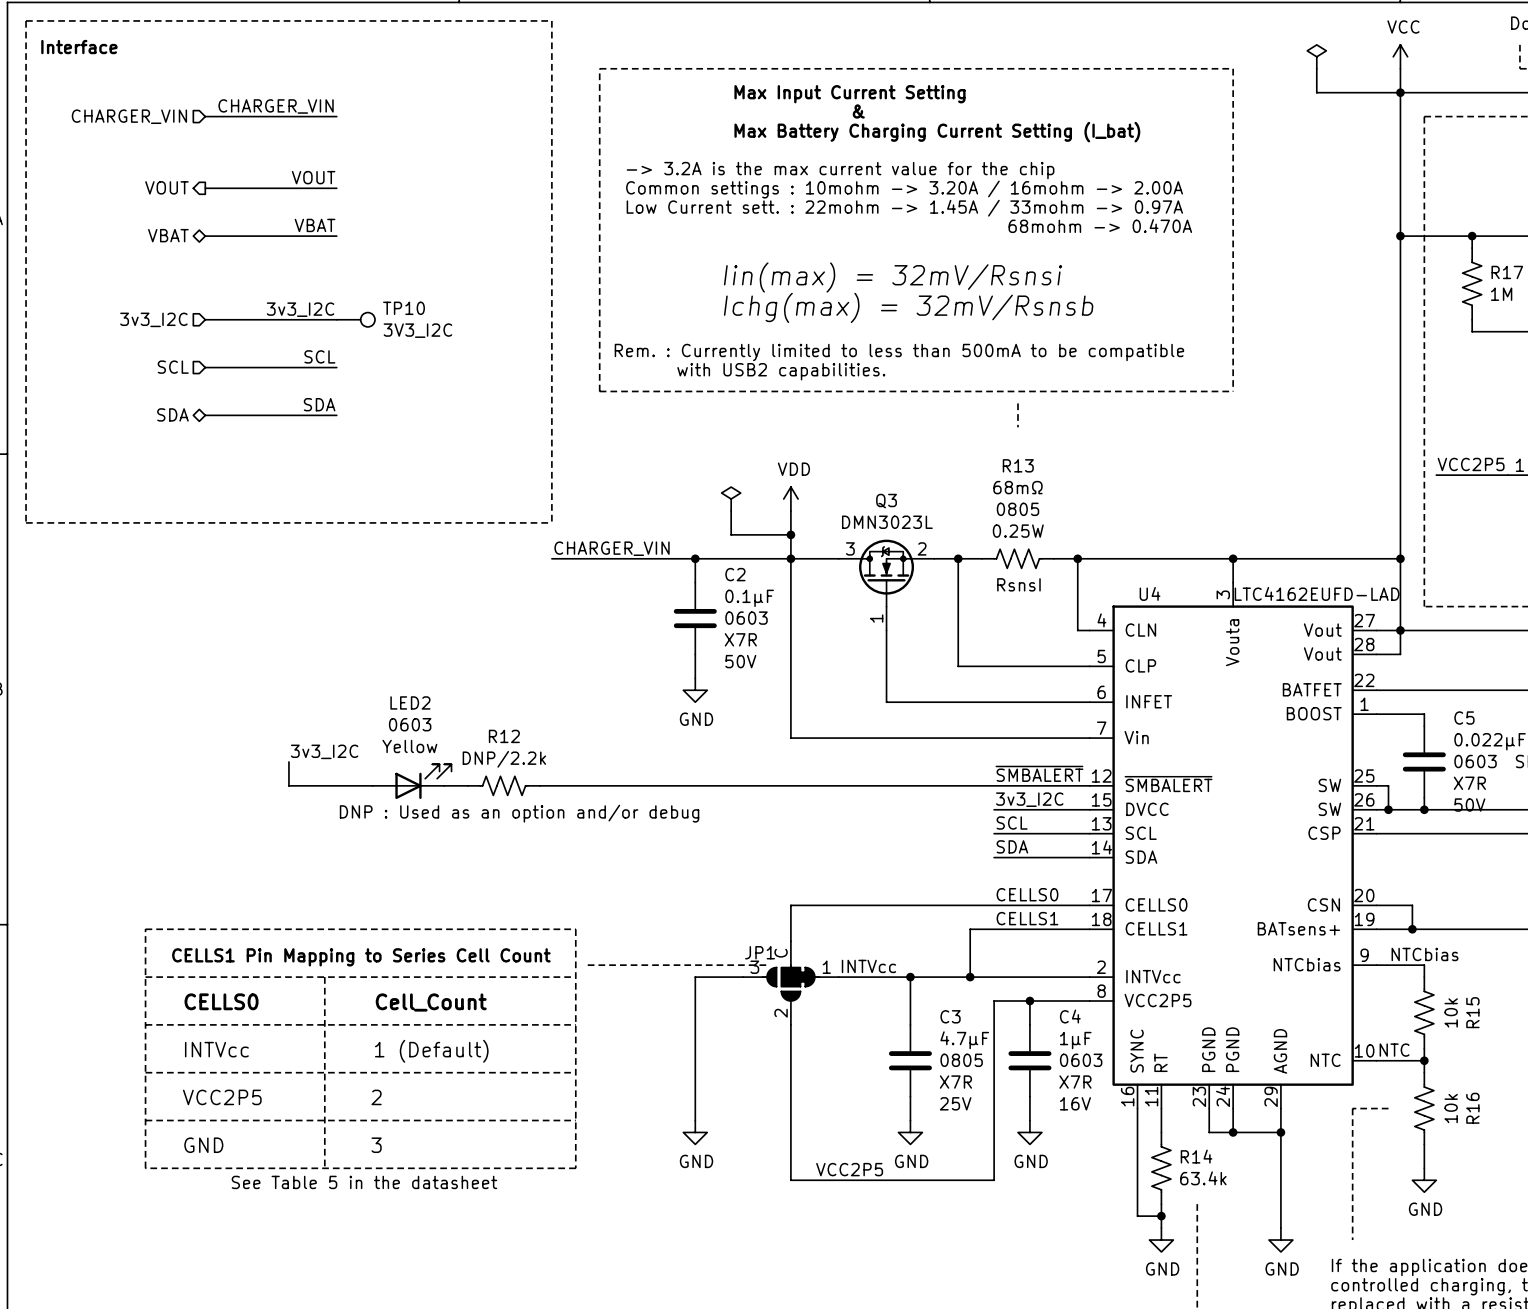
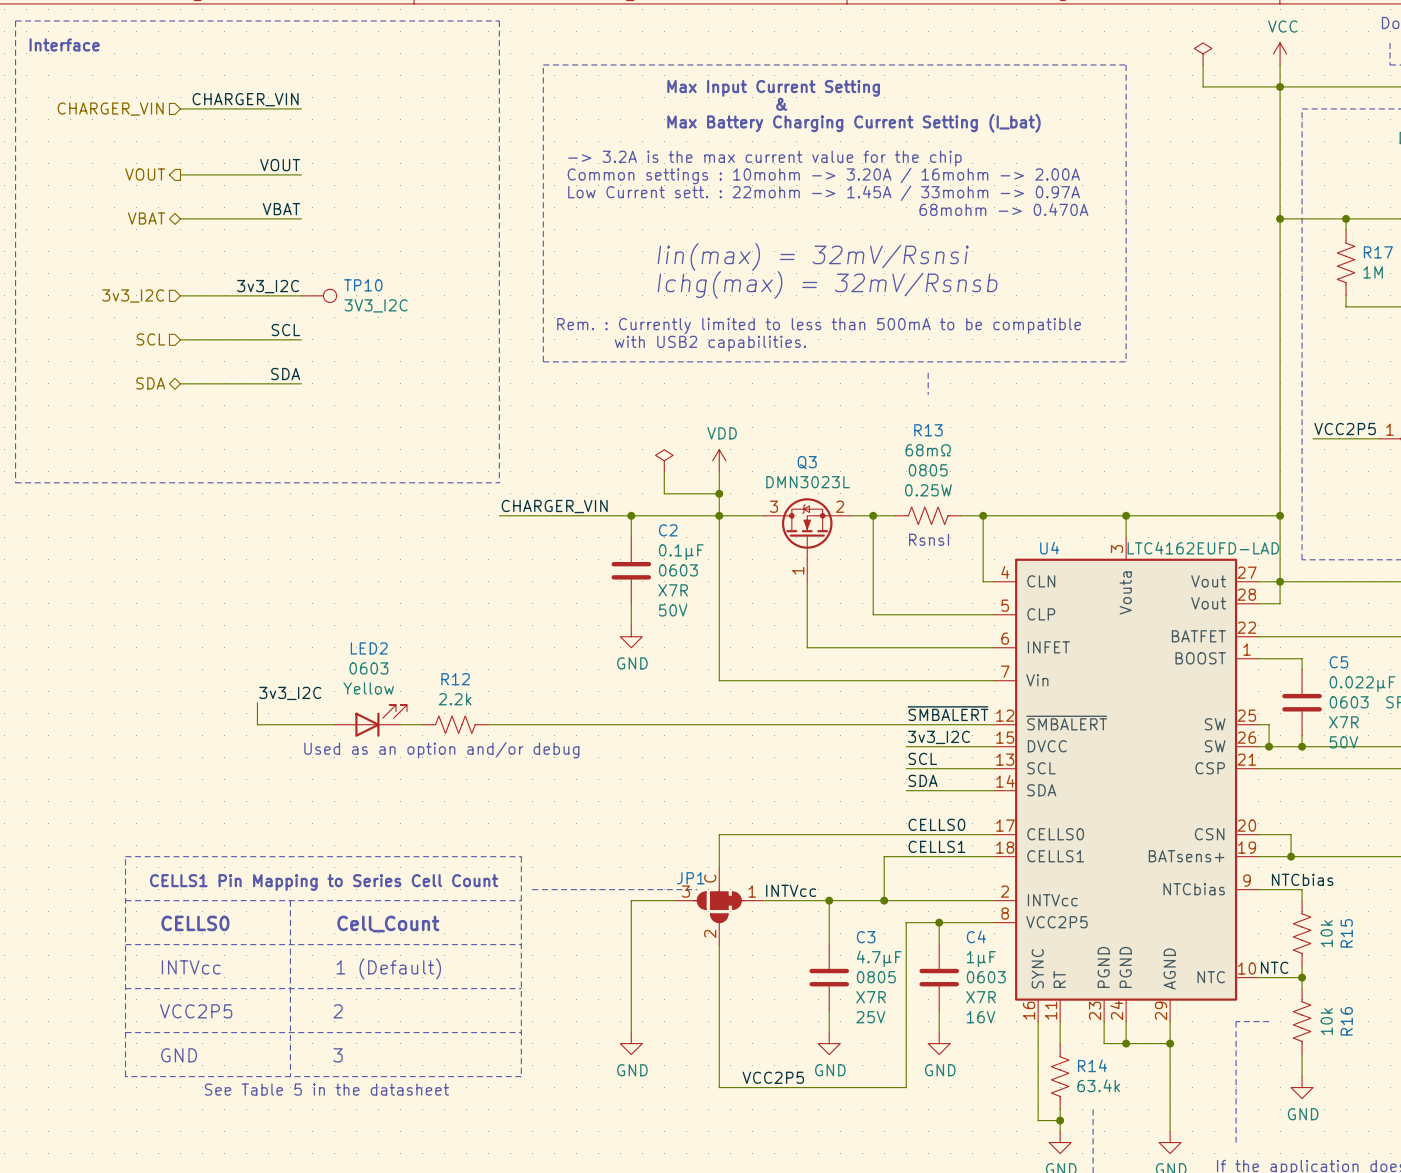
R12 value: DNP/2.2k (504, 759) -> 2.2k (455, 699)
text: DNP : Used as an option and/or debug (519, 813) -> Used as an option and/or debug (441, 750)

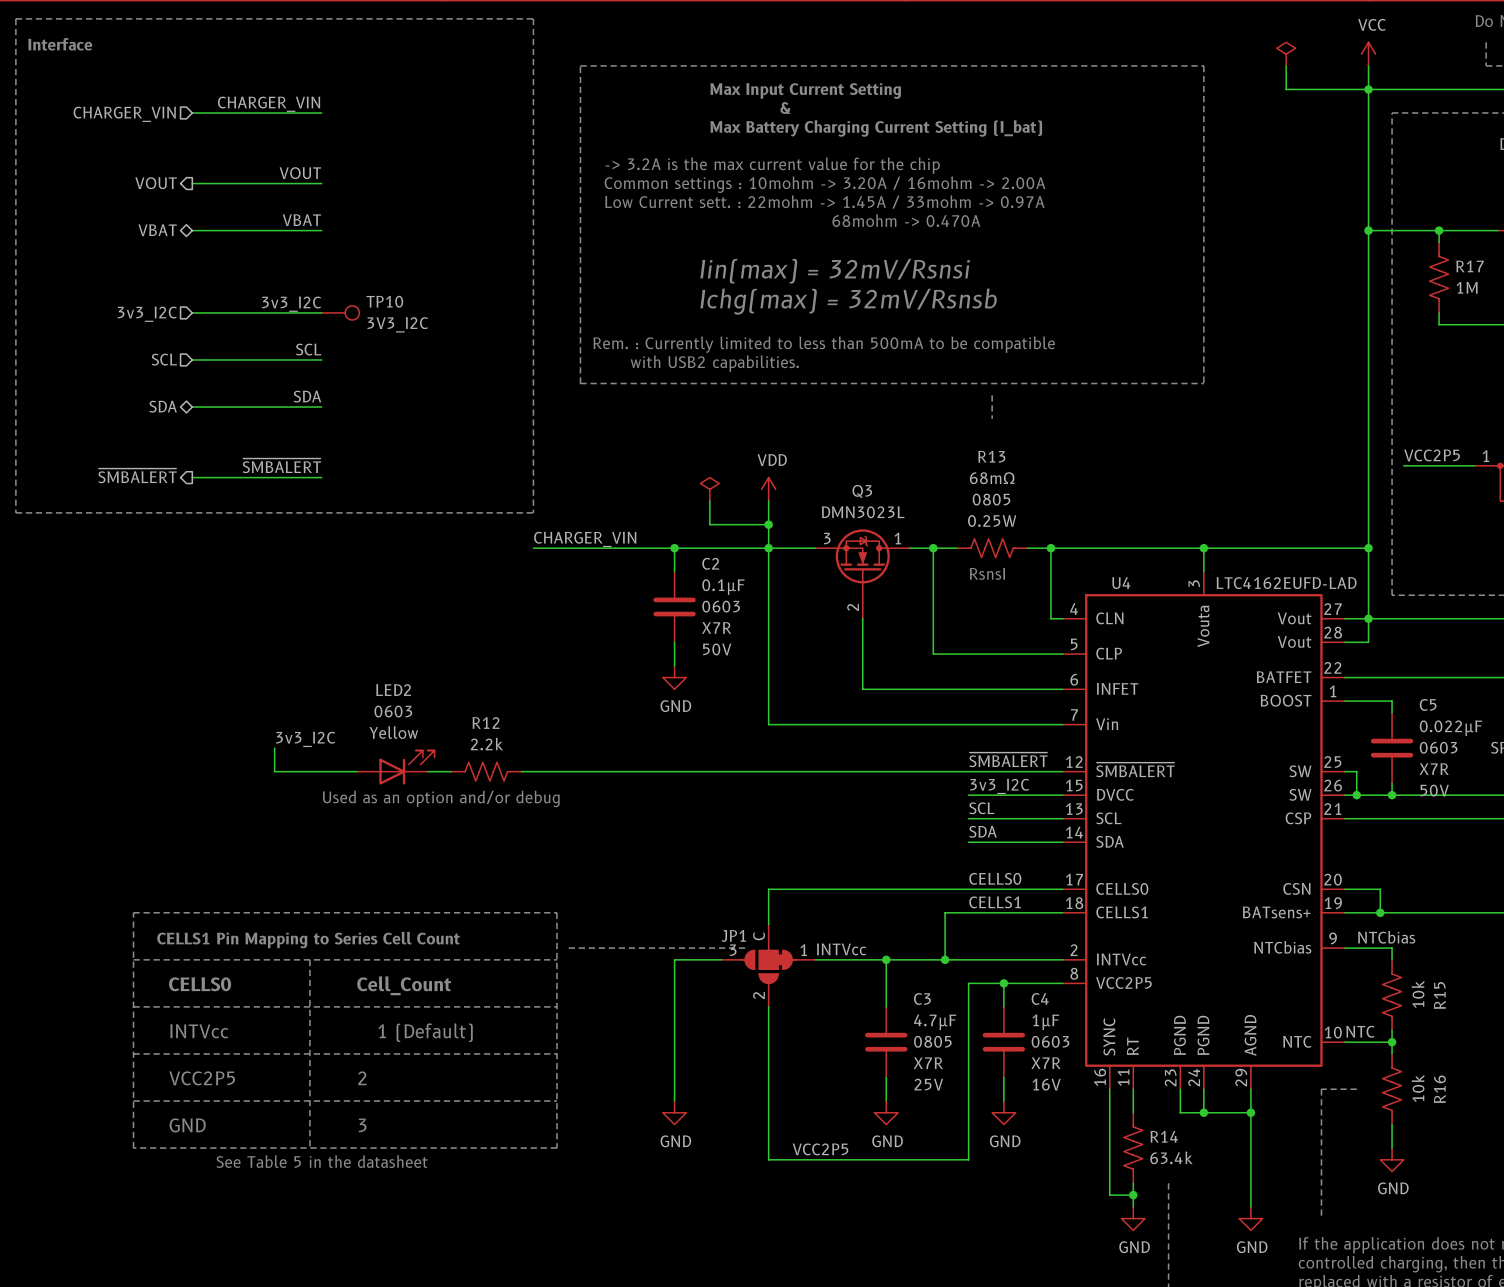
label: none -> ~{SMBALERT} (281, 465)
hierarchical label: none -> ~{SMBALERT} (137, 475)
wire: none -> (192, 477) (321, 477)
Q3 symbol: [763, 498, 852, 582] -> [815, 529, 910, 619]

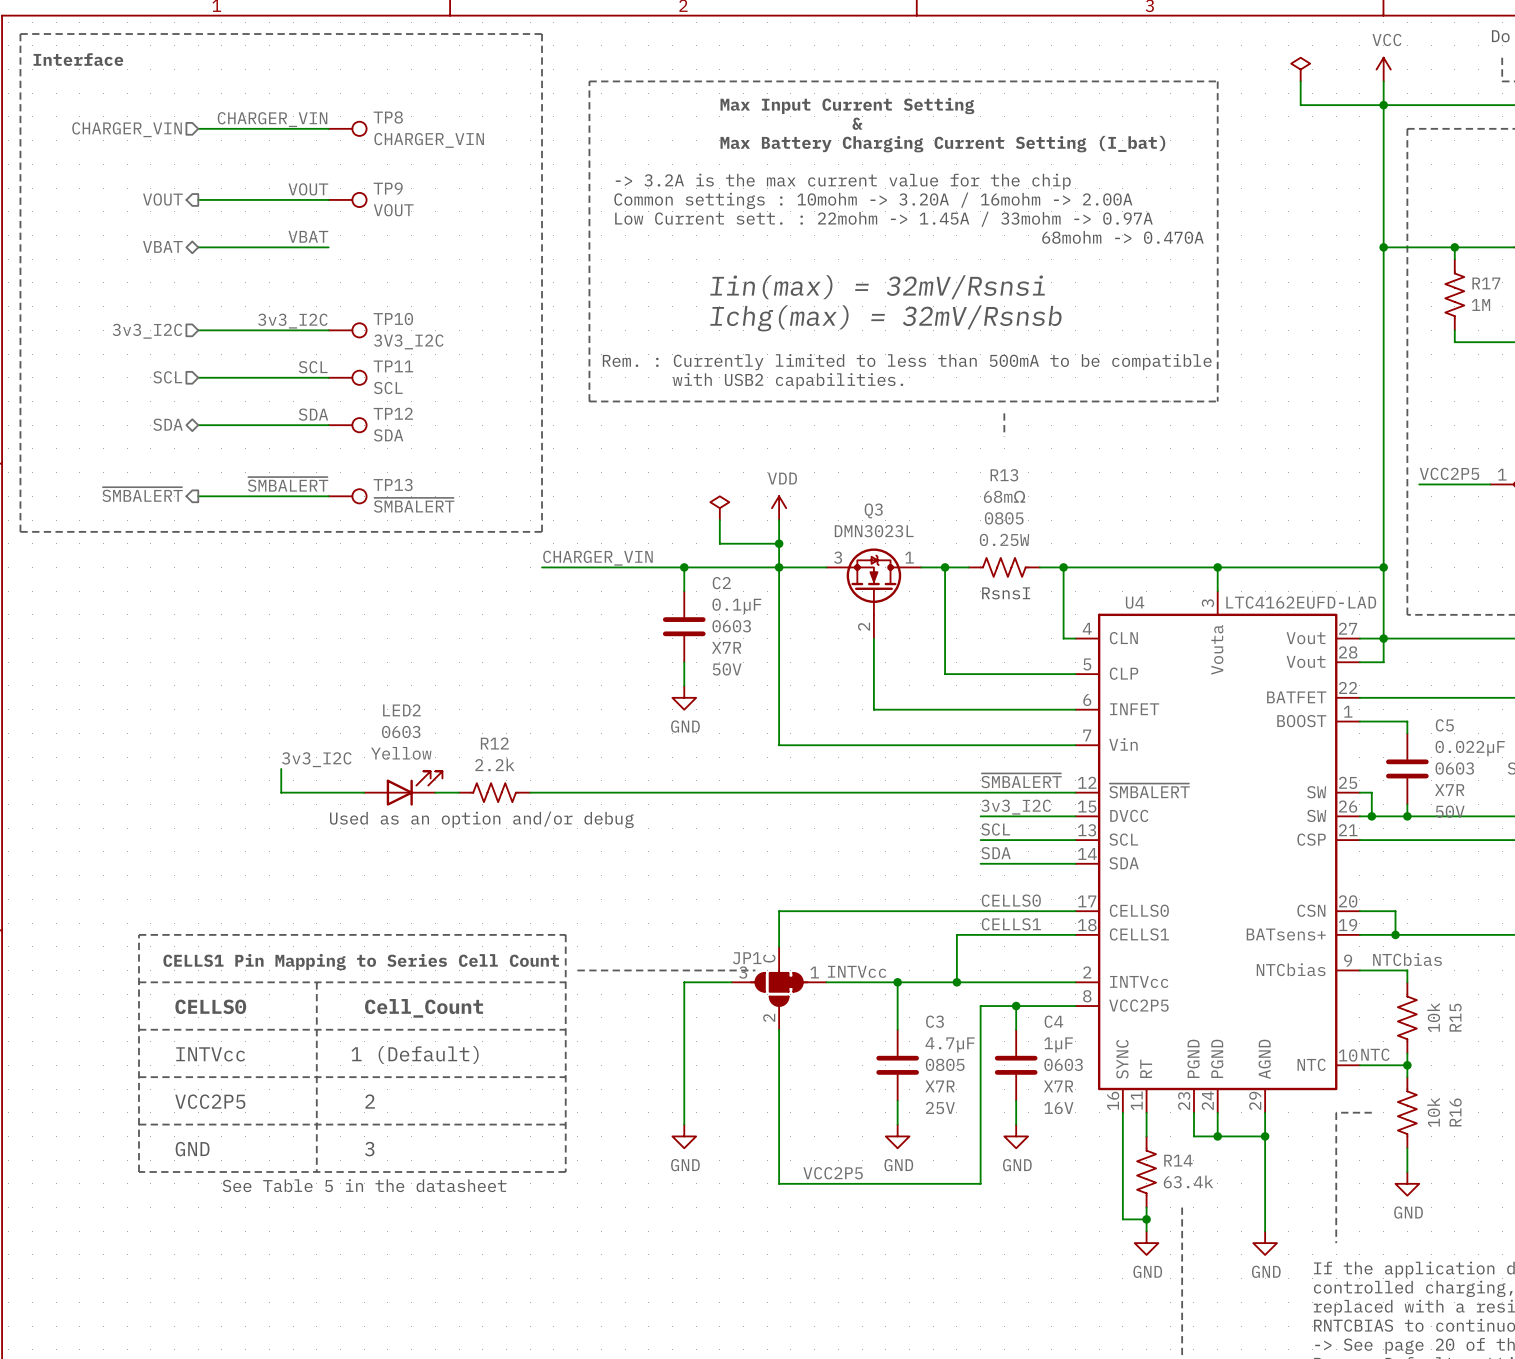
TP8: none -> CHARGER_VIN (347, 128)
TP9: none -> VOUT (347, 199)
TP11: none -> SCL (347, 377)
TP12: none -> SDA (347, 425)
TP13: none -> ~{SMBALERT} (347, 496)

